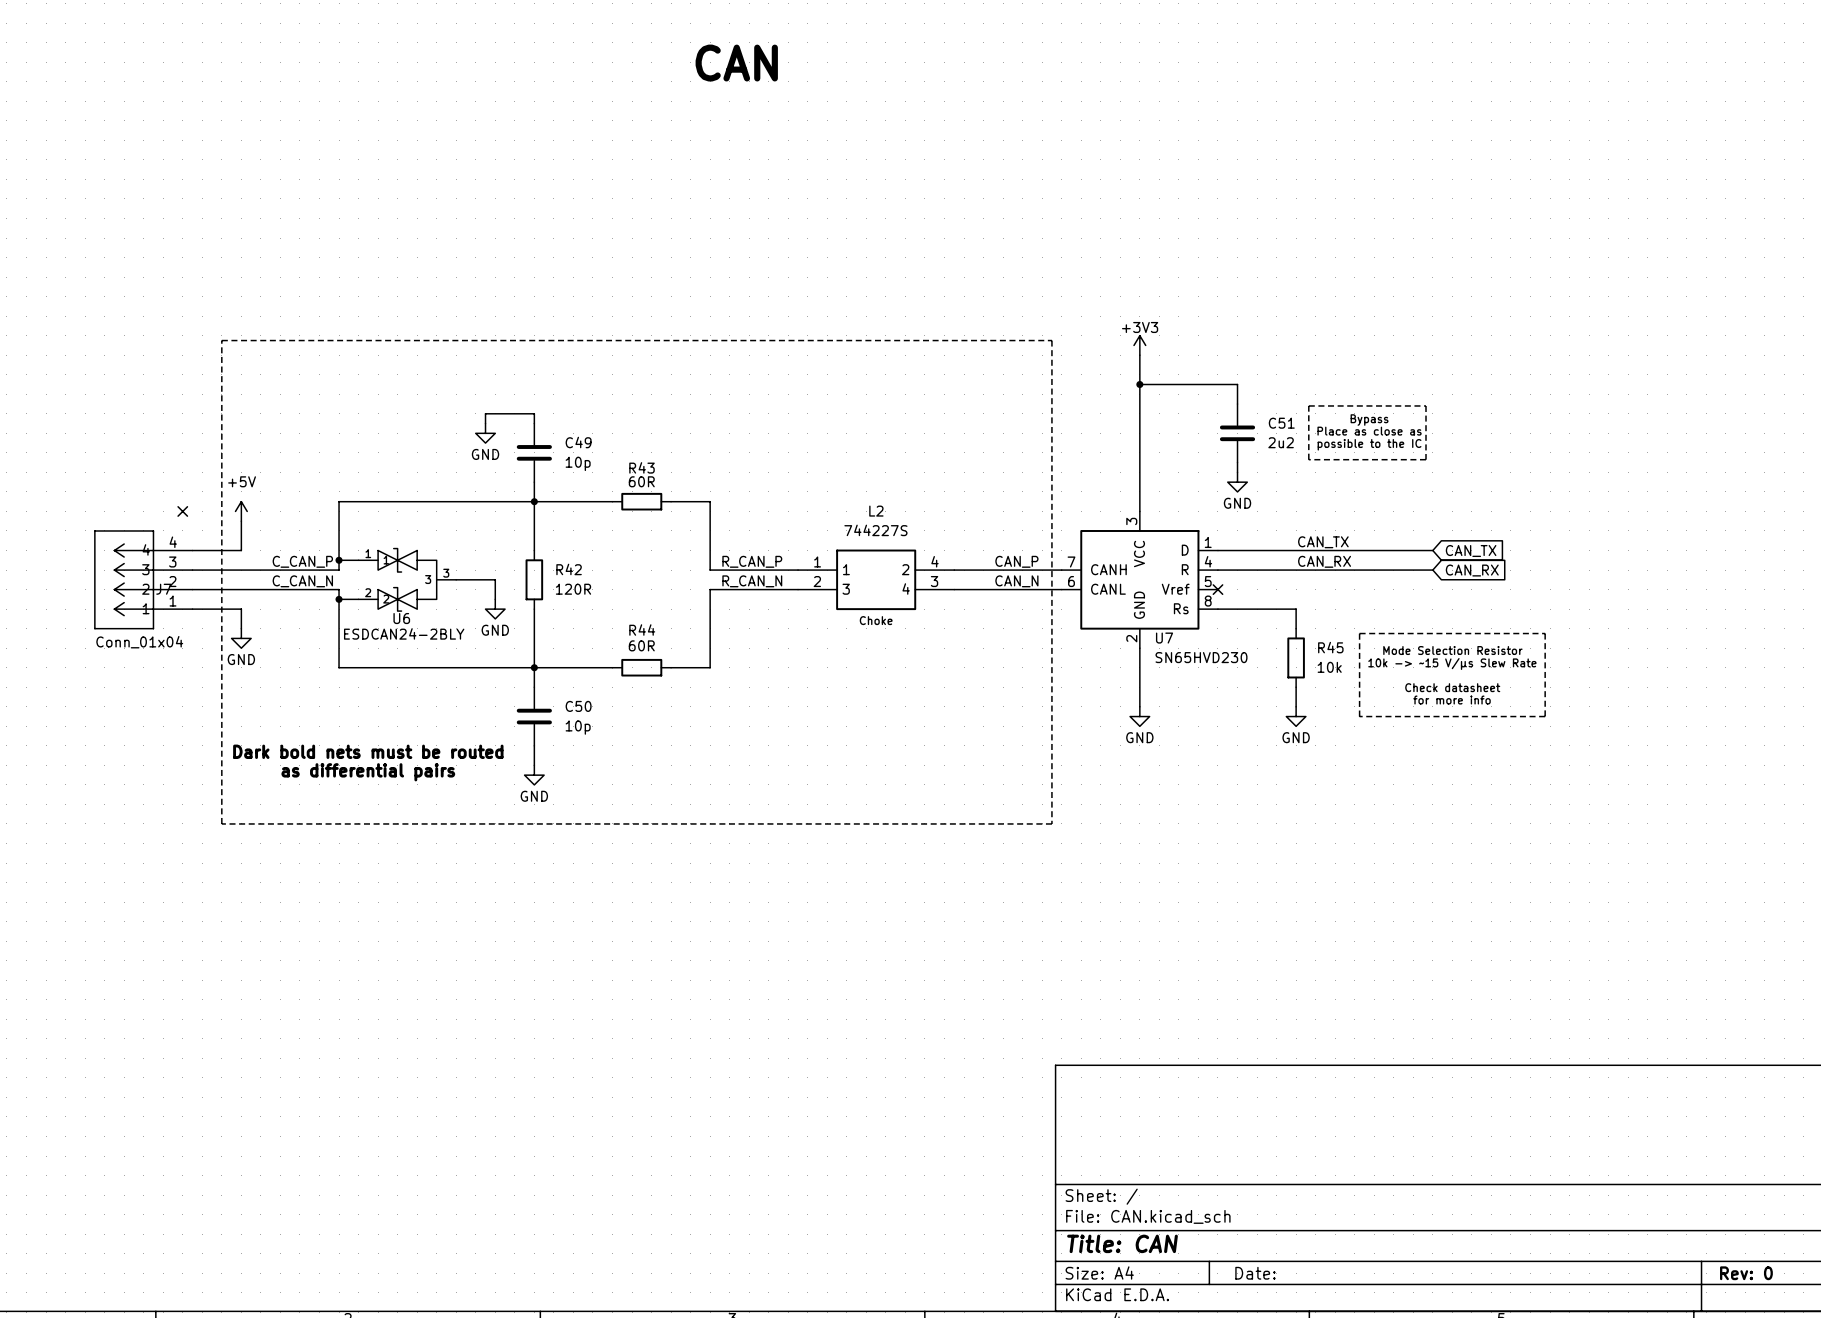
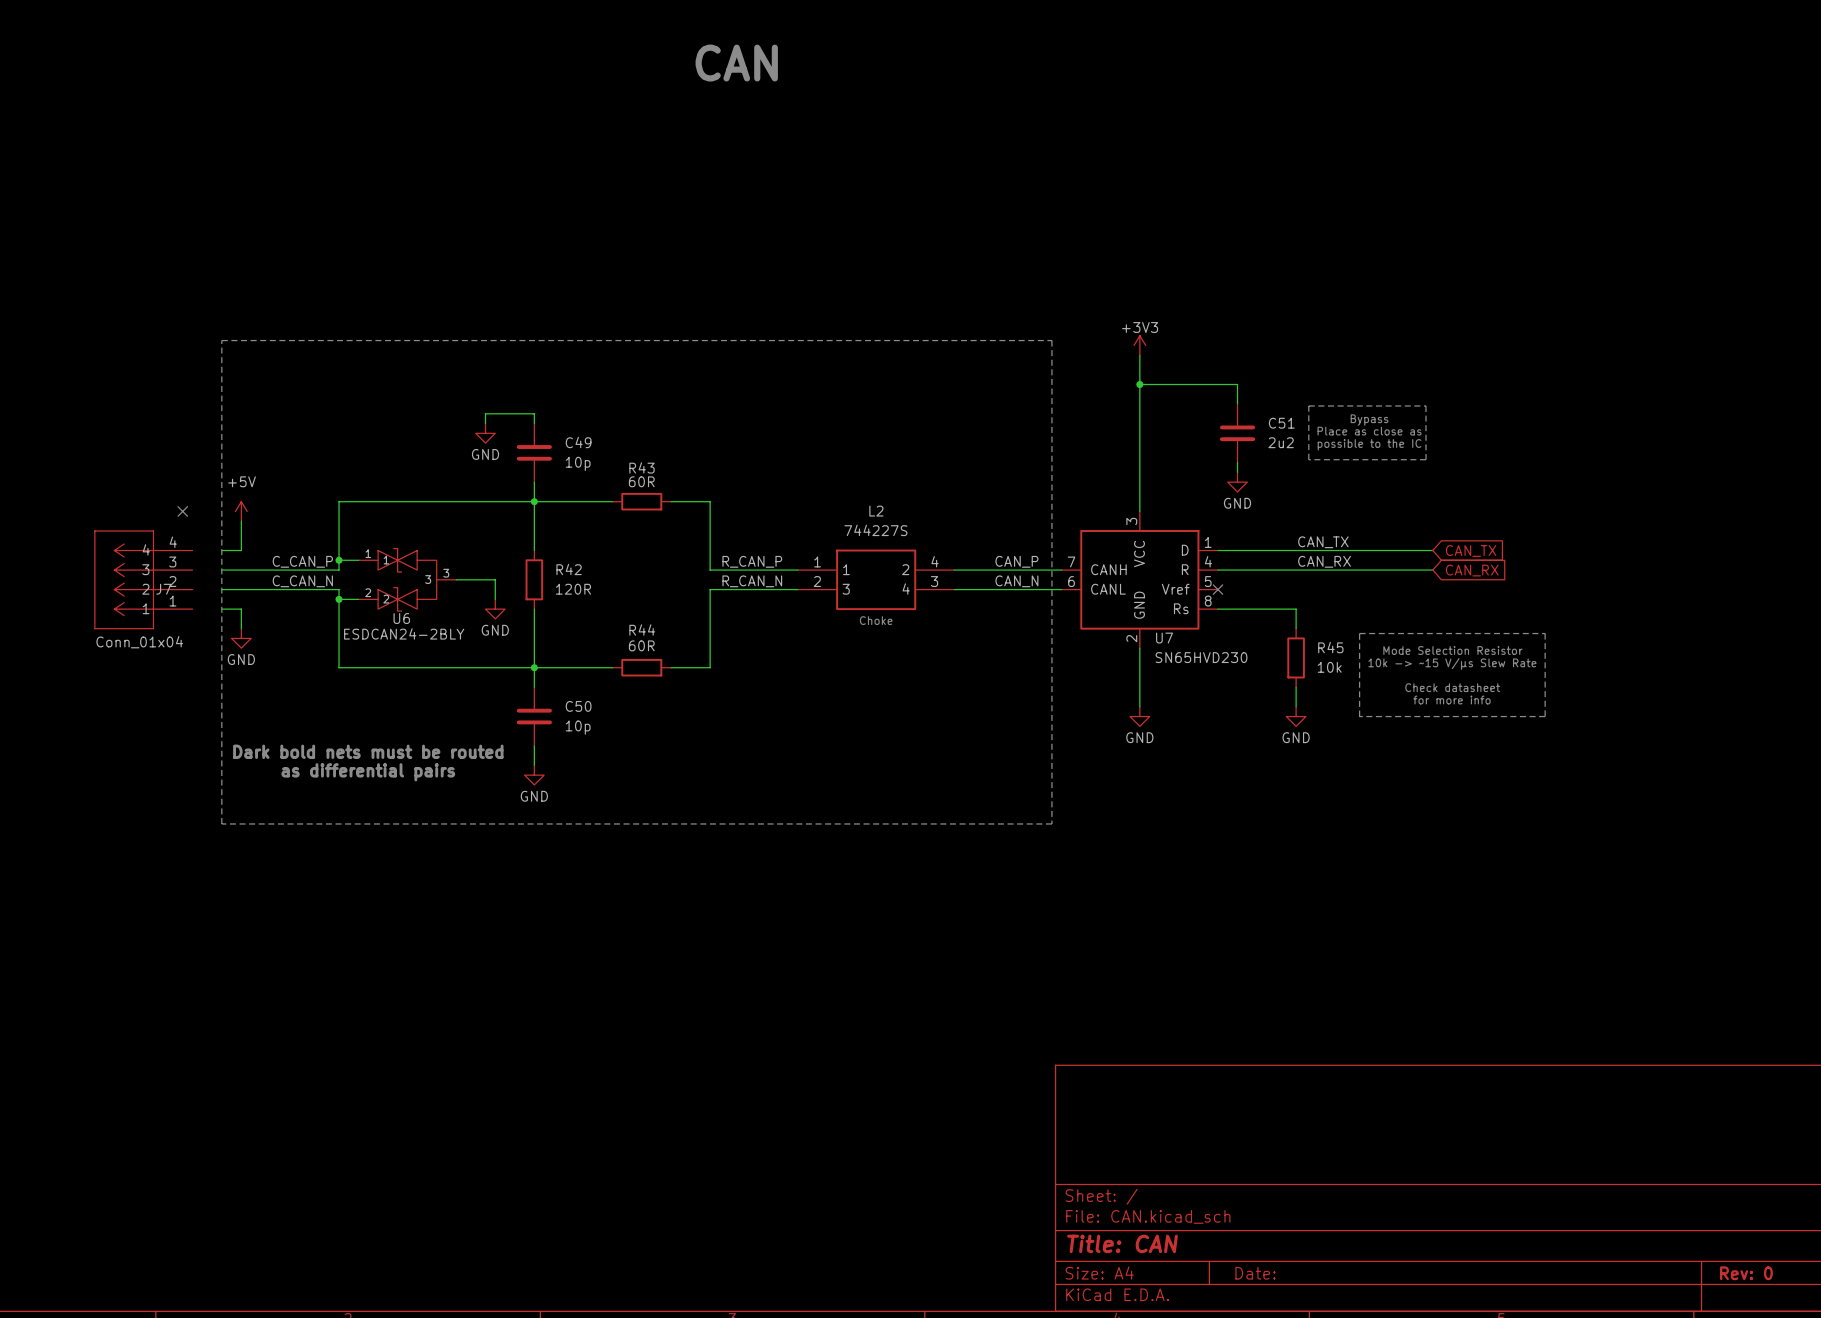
wire: (192, 550) (221, 550) -> none
wire: (192, 570) (221, 570) -> none
wire: (192, 589) (221, 589) -> none
wire: (192, 609) (221, 609) -> none

